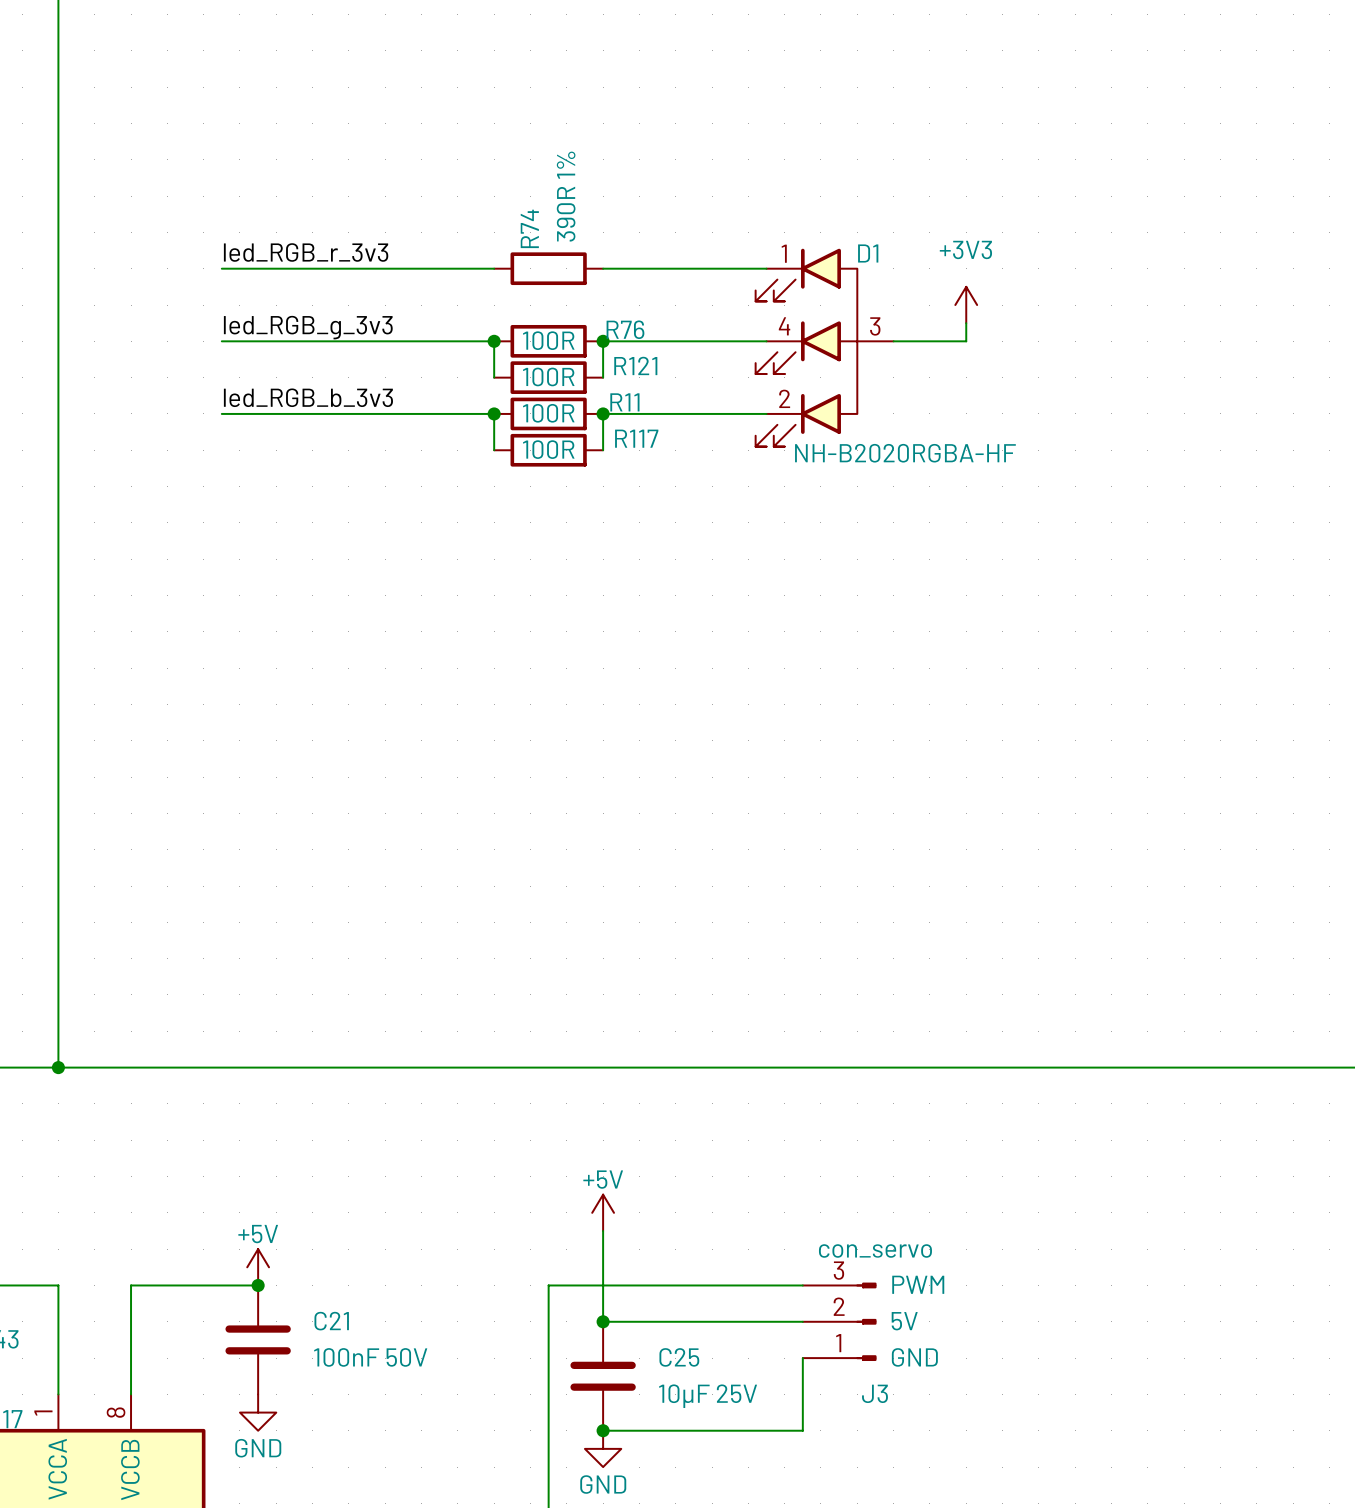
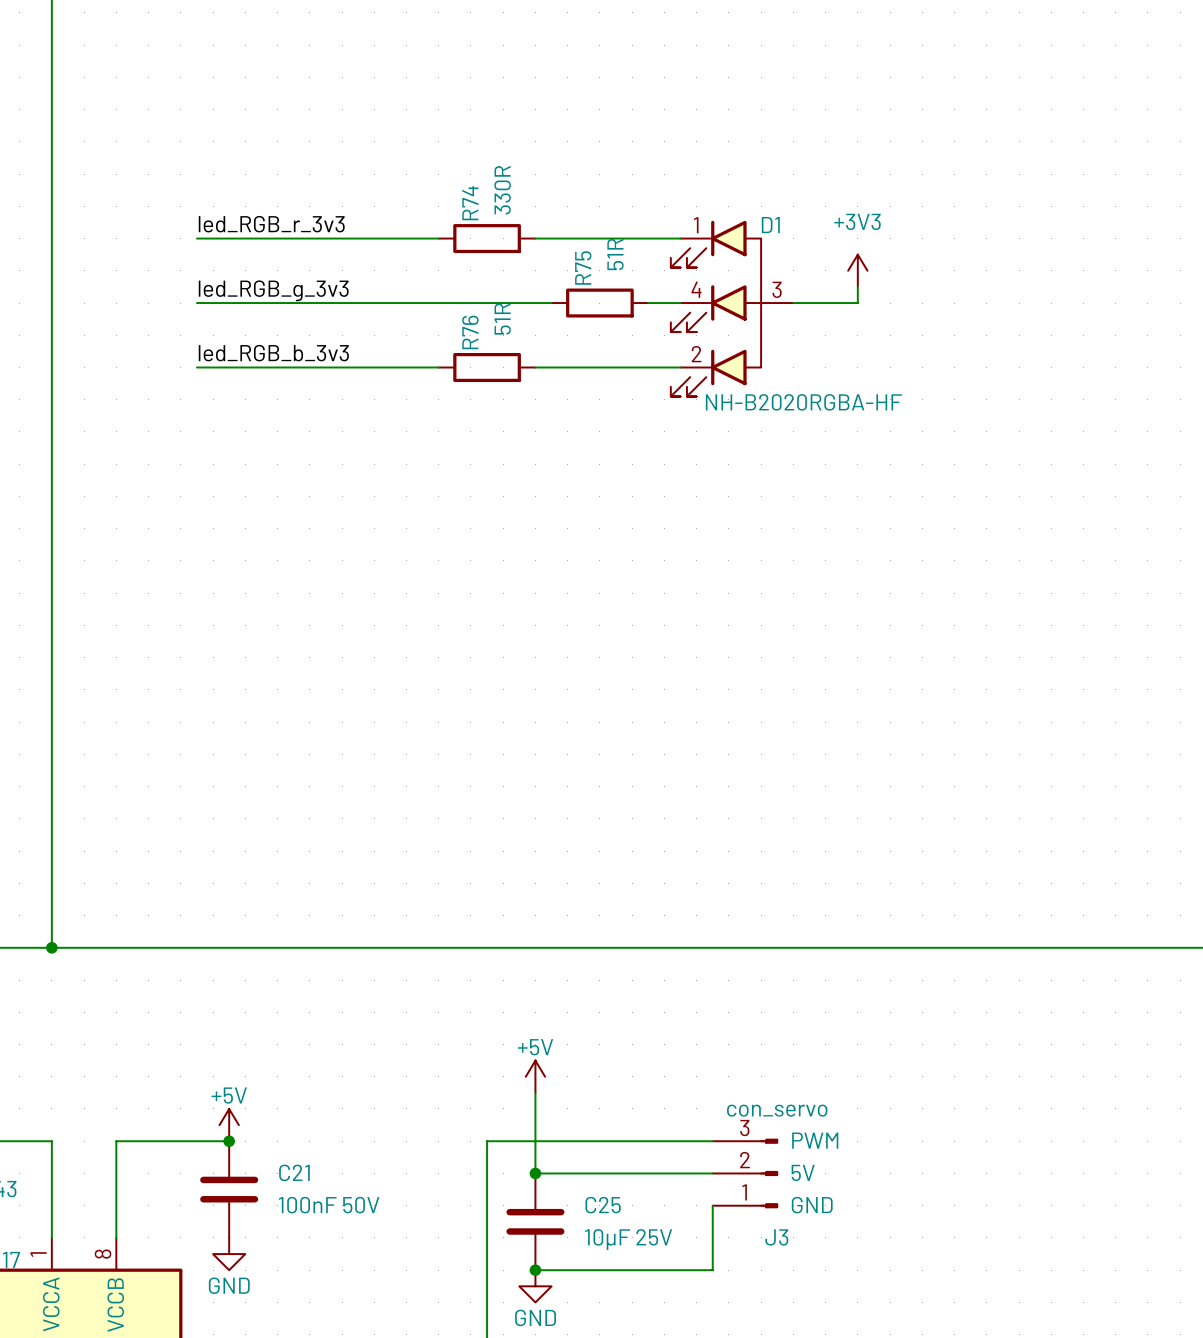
R74 value: 390R 1% (566, 196) -> 330R (502, 190)
wire: (494, 341) (494, 377) -> (438, 303) (535, 303)
junction: (494, 341) -> none
R76: 100R (548, 341) -> none
wire: (603, 341) (603, 377) -> none
junction: (603, 341) -> none
wire: (621, 341) (730, 341) -> none
R75: none -> 51R (599, 303)
R121: 100R (548, 377) -> none
R11 name: R11 (624, 402) -> R76 (470, 332)
wire: (494, 413) (494, 450) -> none
junction: (494, 413) -> none
R11 value: 100R (548, 413) -> 51R (502, 318)
wire: (603, 413) (603, 450) -> none
junction: (603, 413) -> none
R117: 100R (548, 450) -> none

